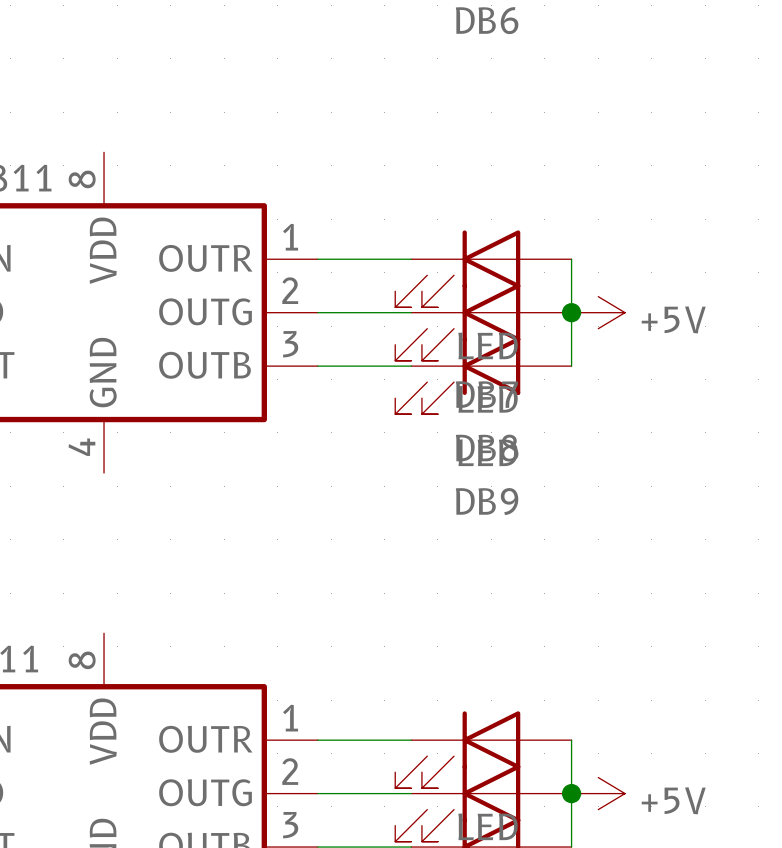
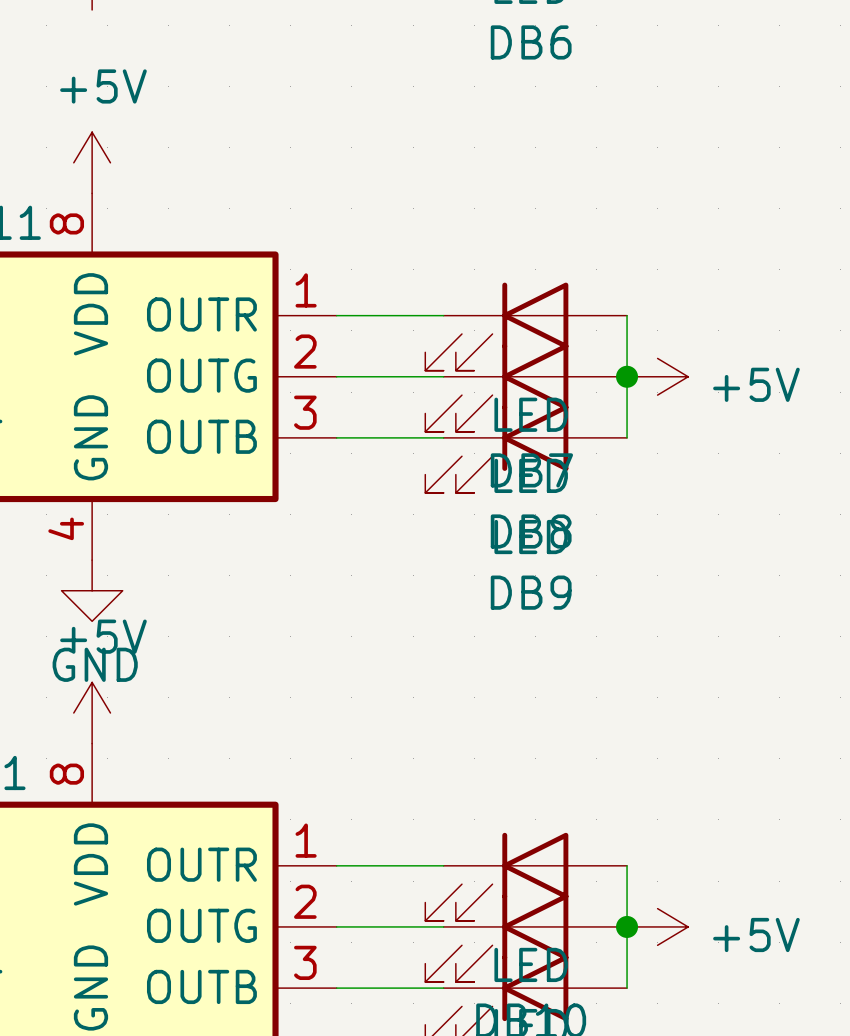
power symbol: none -> +5V (92, 162)
power symbol: none -> GND (92, 590)
power symbol: none -> +5V (92, 713)

